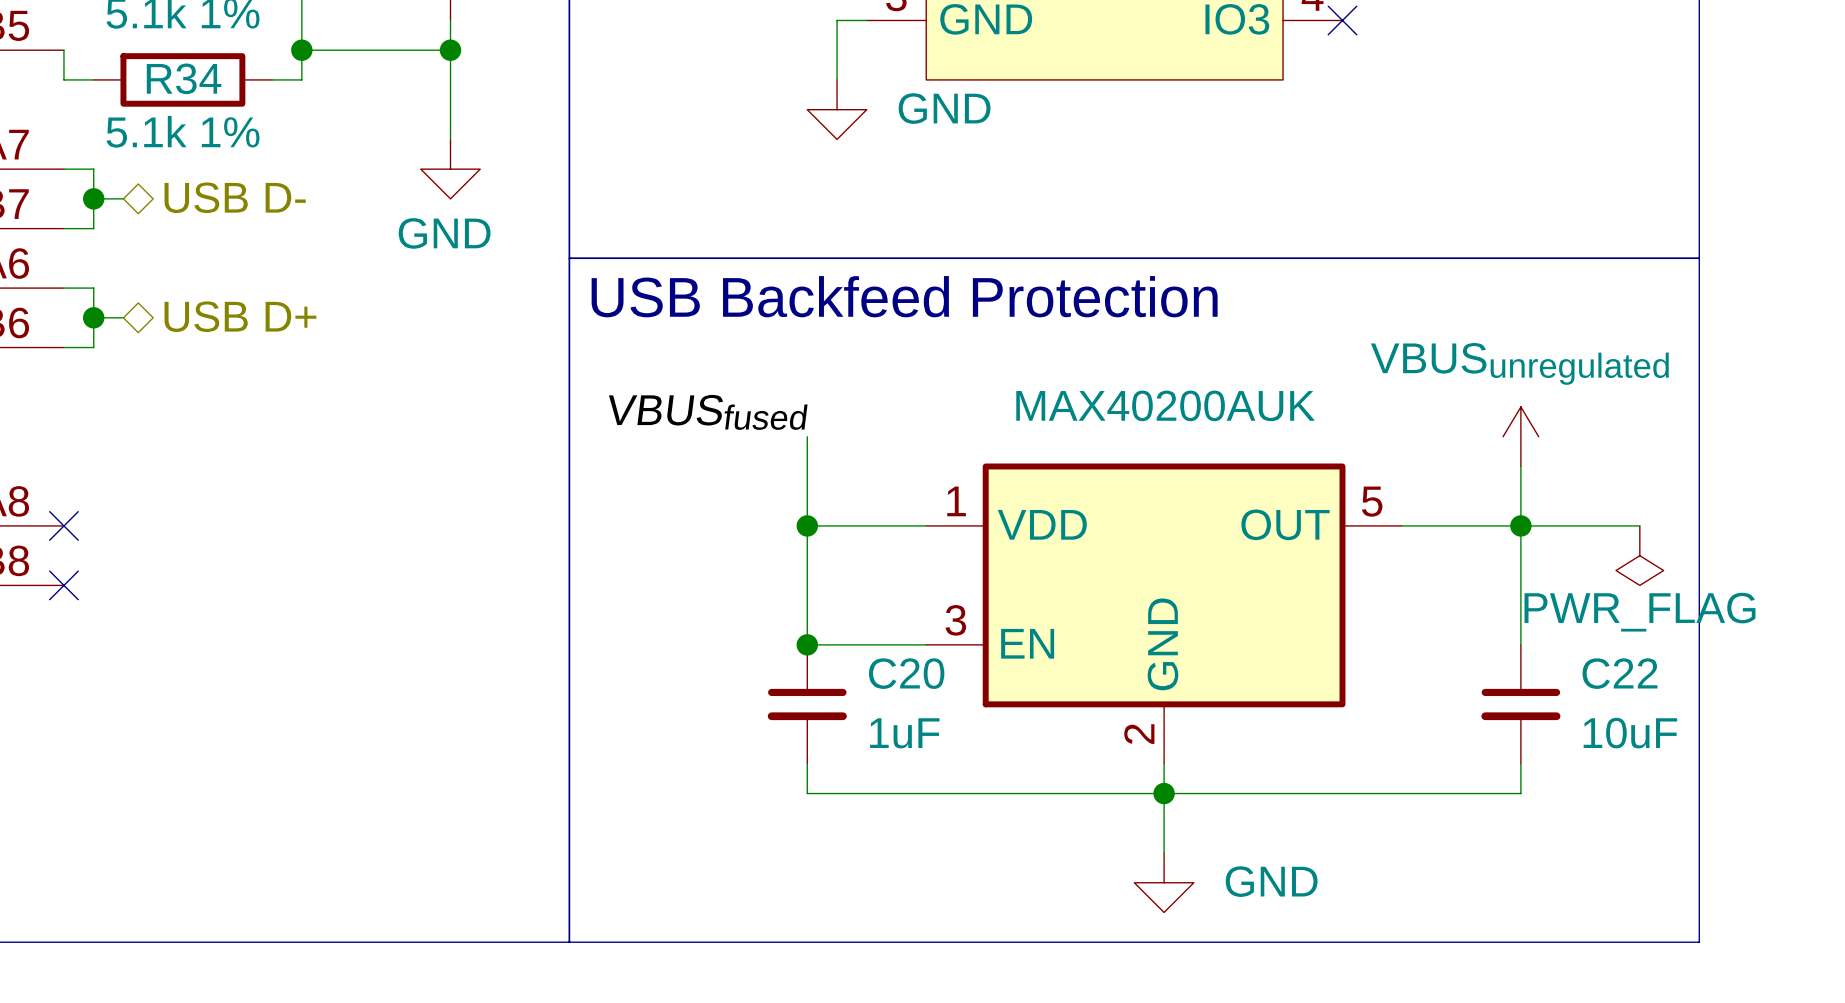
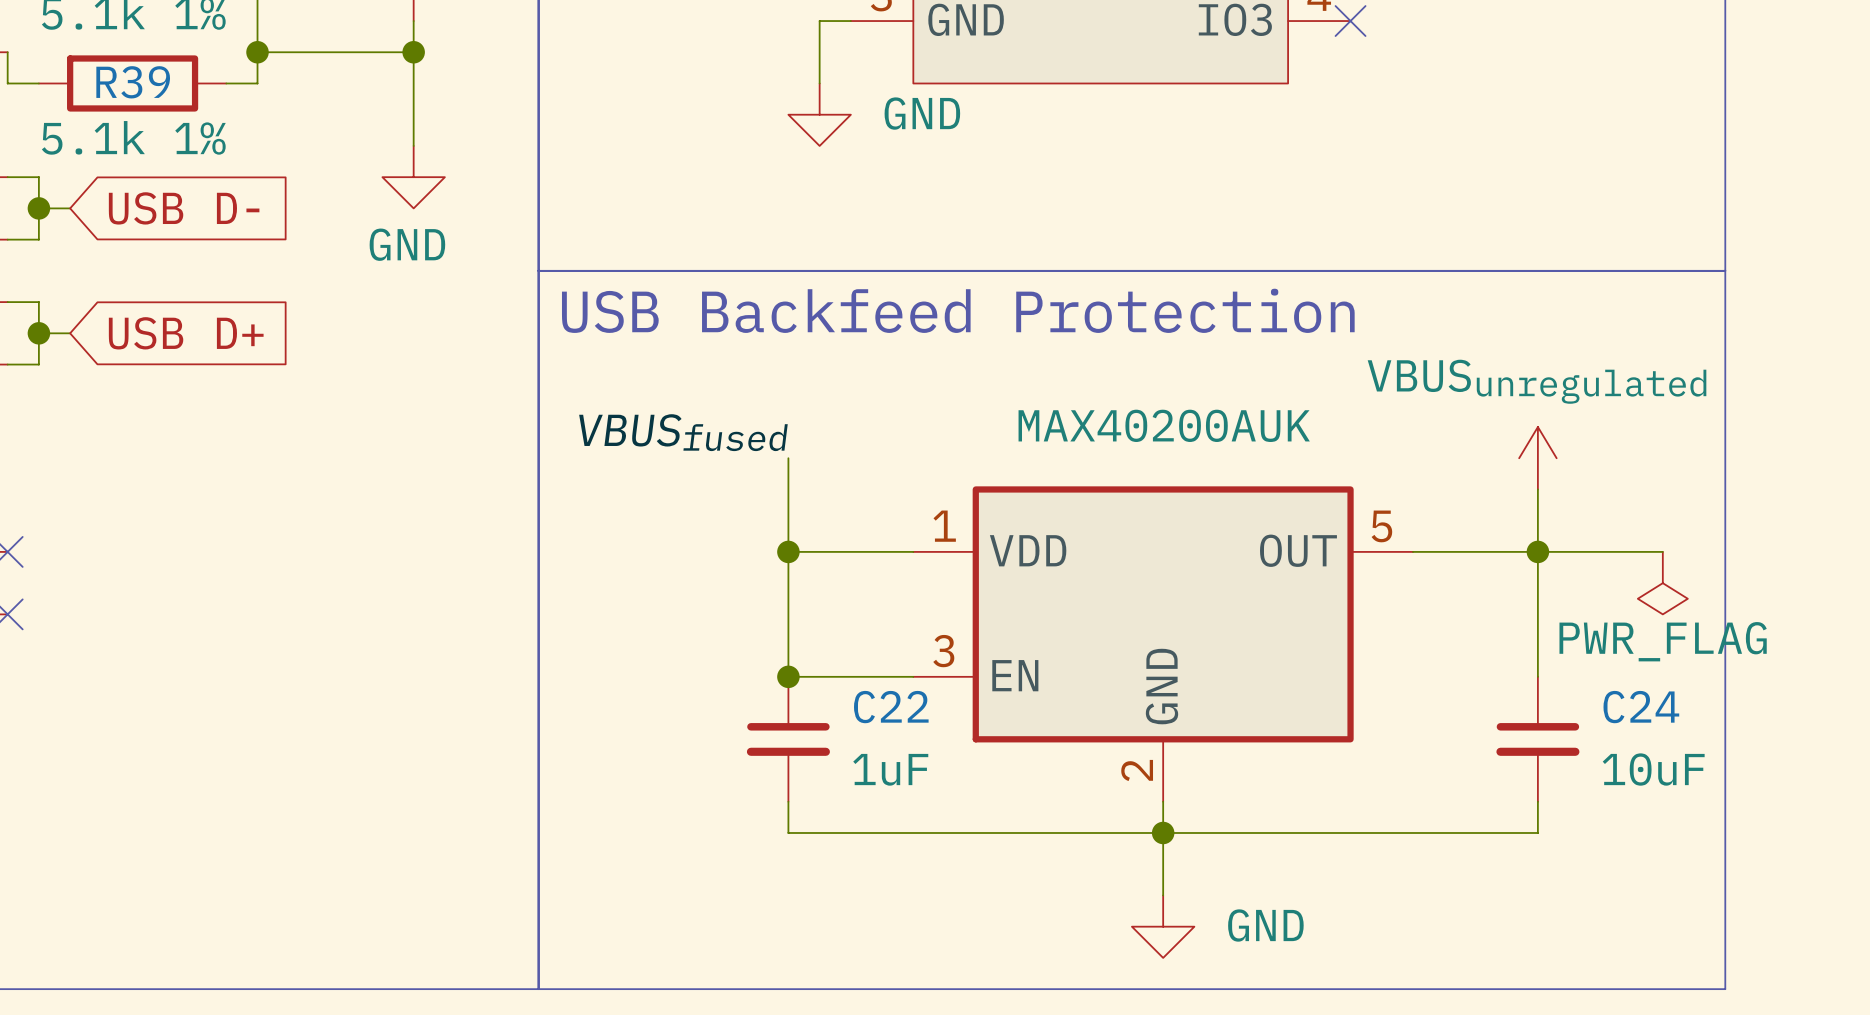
R34 name: R34 (184, 78) -> R39 (133, 82)
hierarchical label: USB D- (235, 197) -> none
global label: none -> USB D- (184, 208)
hierarchical label: USB D+ (240, 316) -> none
global label: none -> USB D+ (186, 333)
C20 name: C20 (906, 673) -> C22 (891, 707)
C22 name: C22 (1620, 673) -> C24 (1641, 707)

